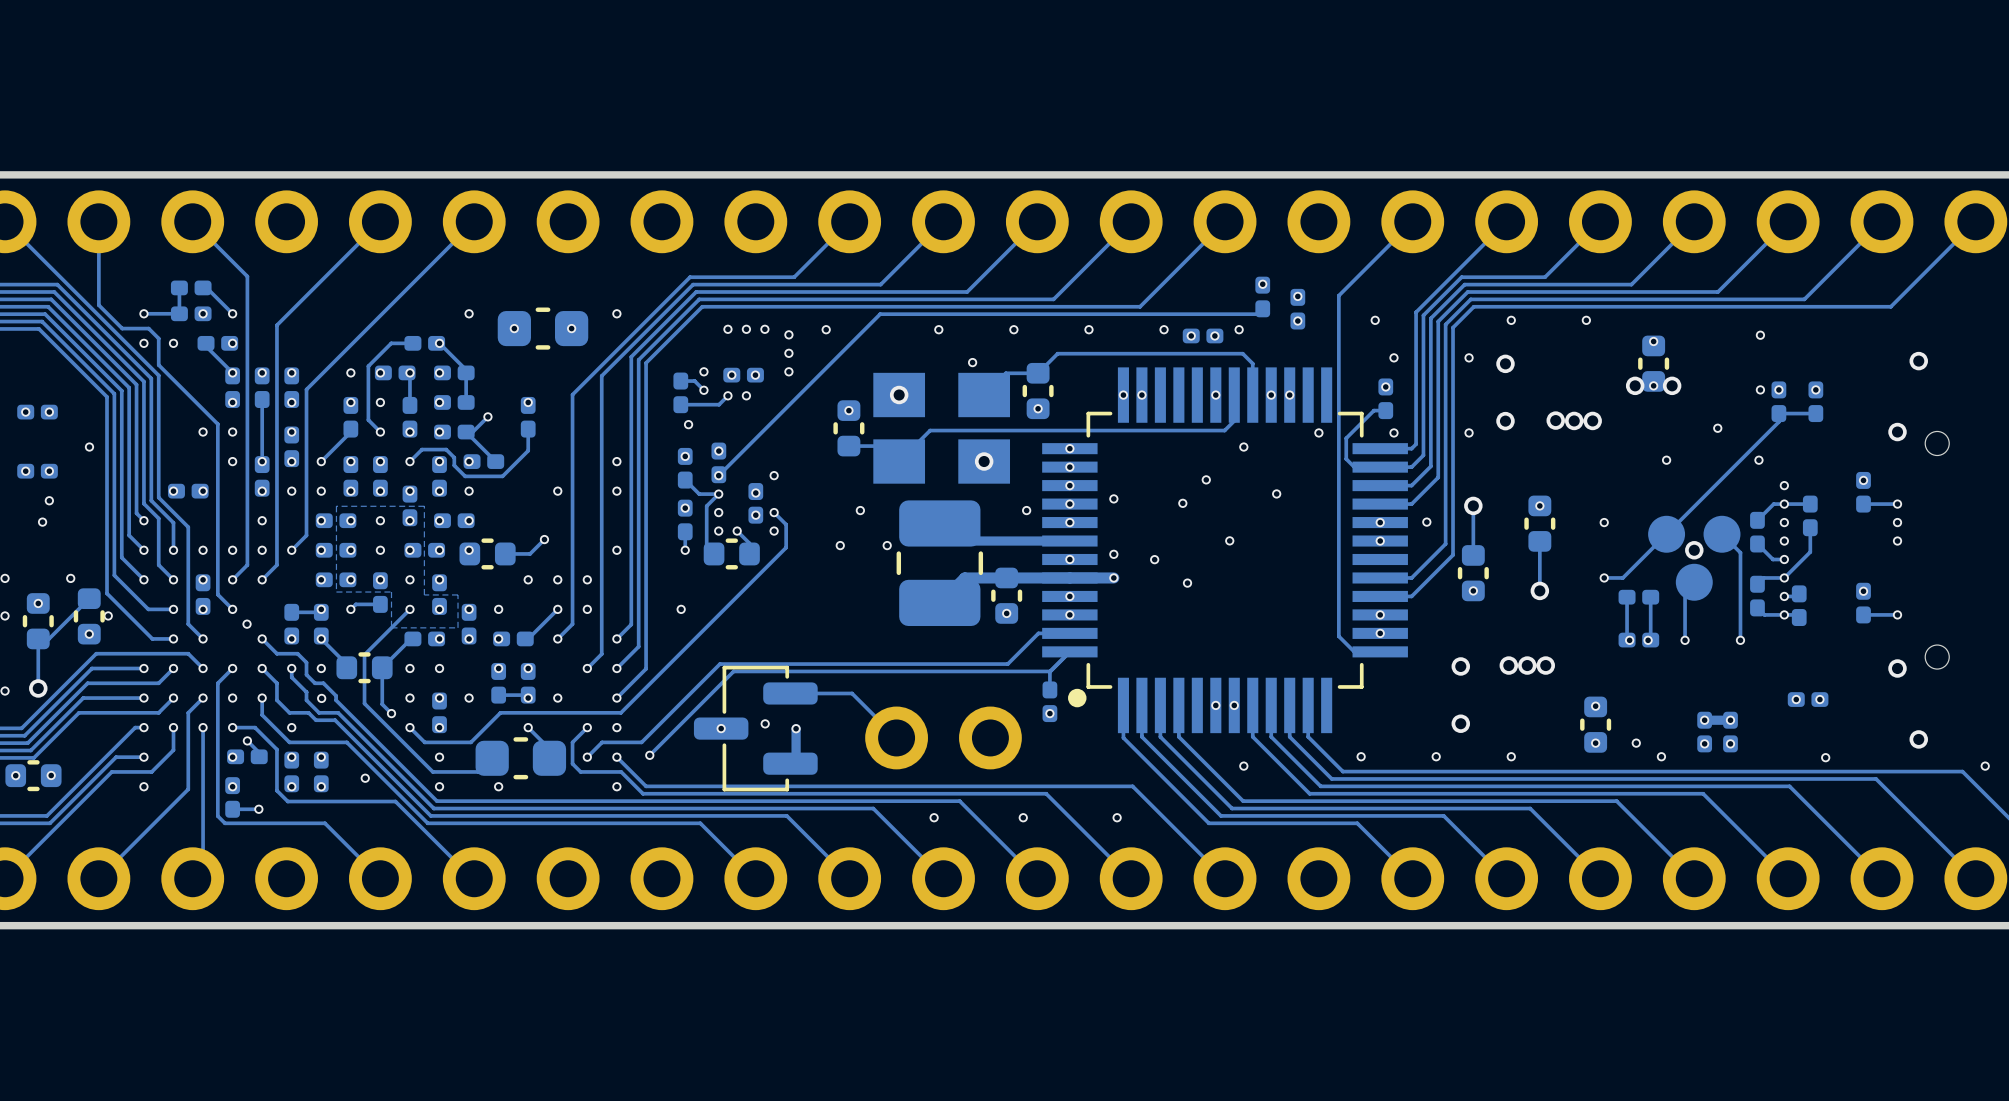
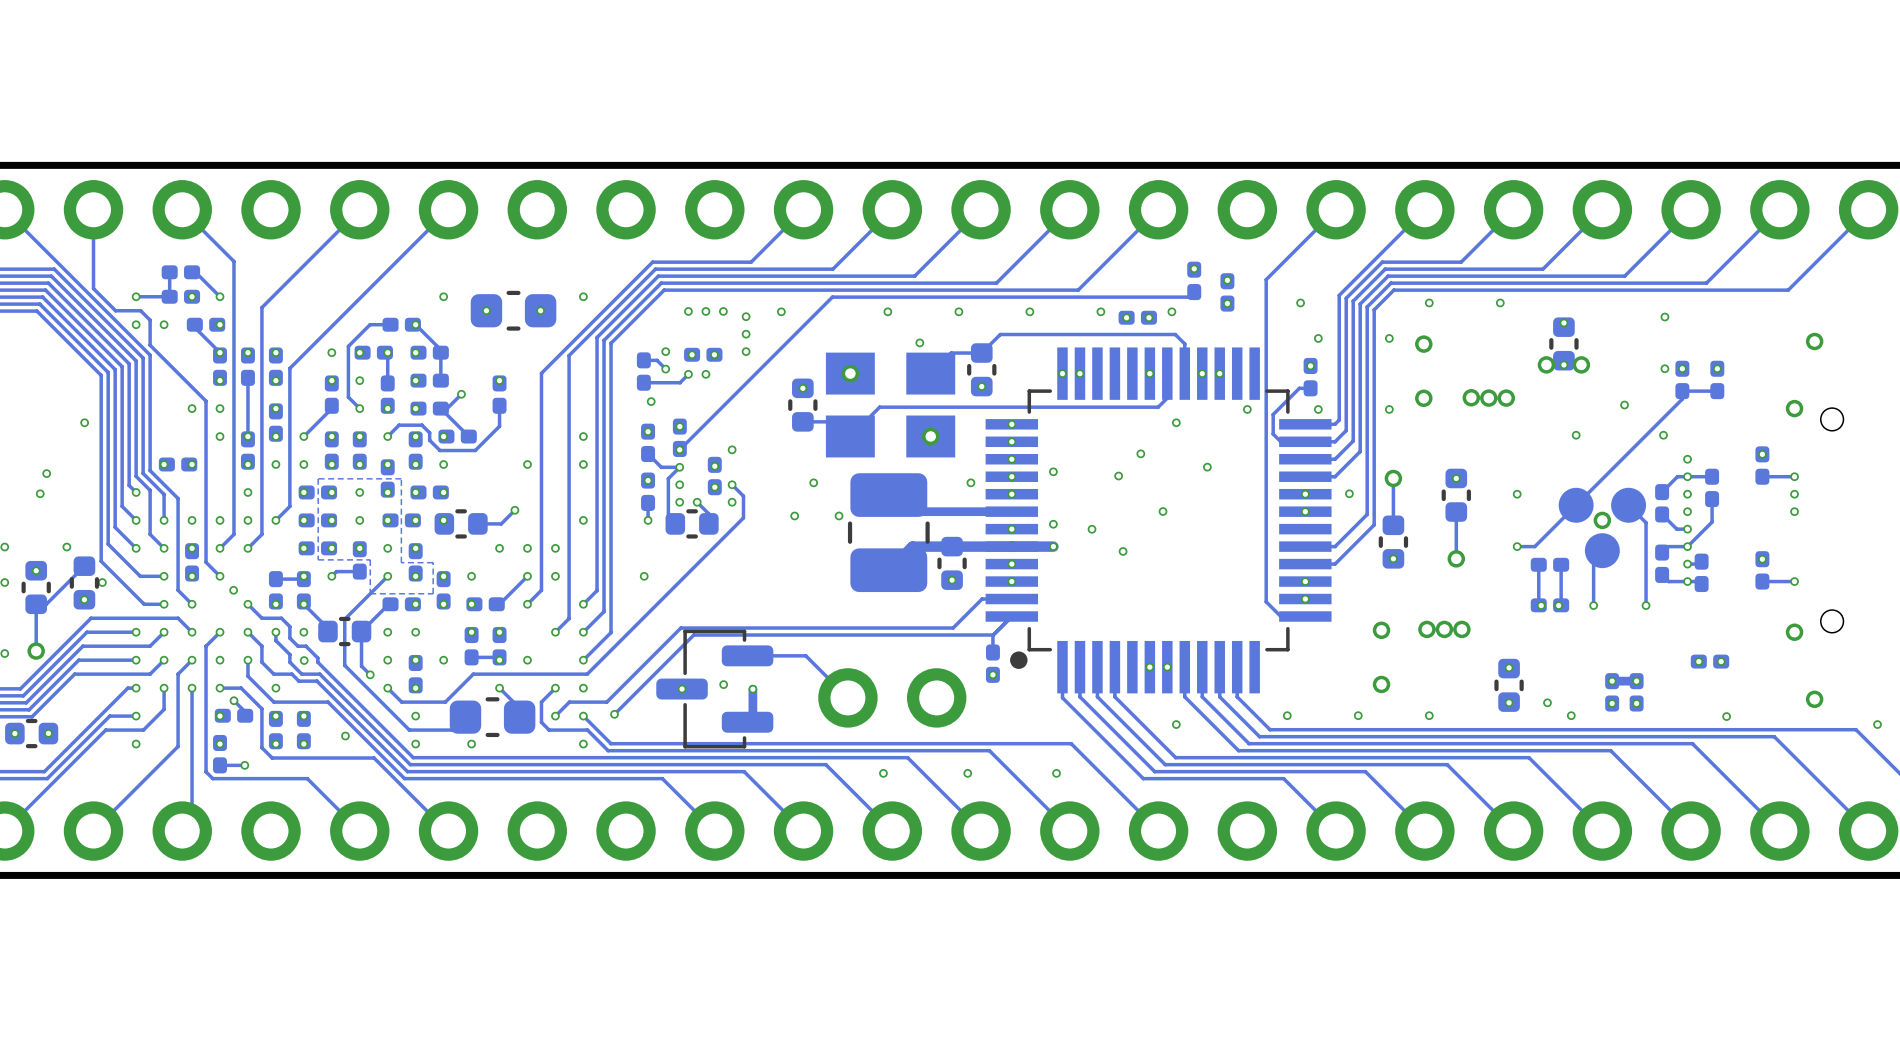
via: (25, 412) -> none
part: (37, 412) -> none
via: (49, 412) -> none
via: (25, 471) -> none
part: (37, 471) -> none
via: (49, 471) -> none

